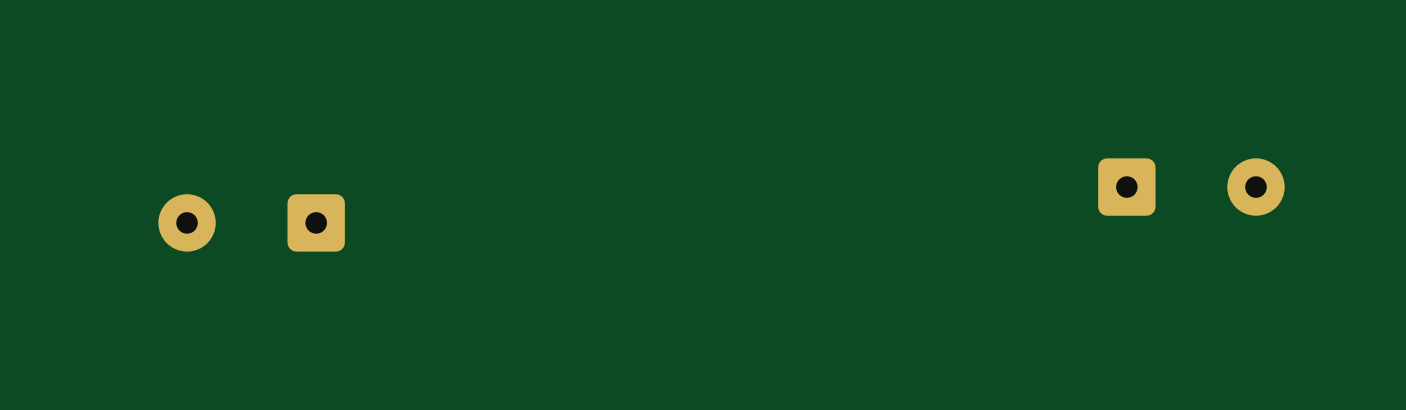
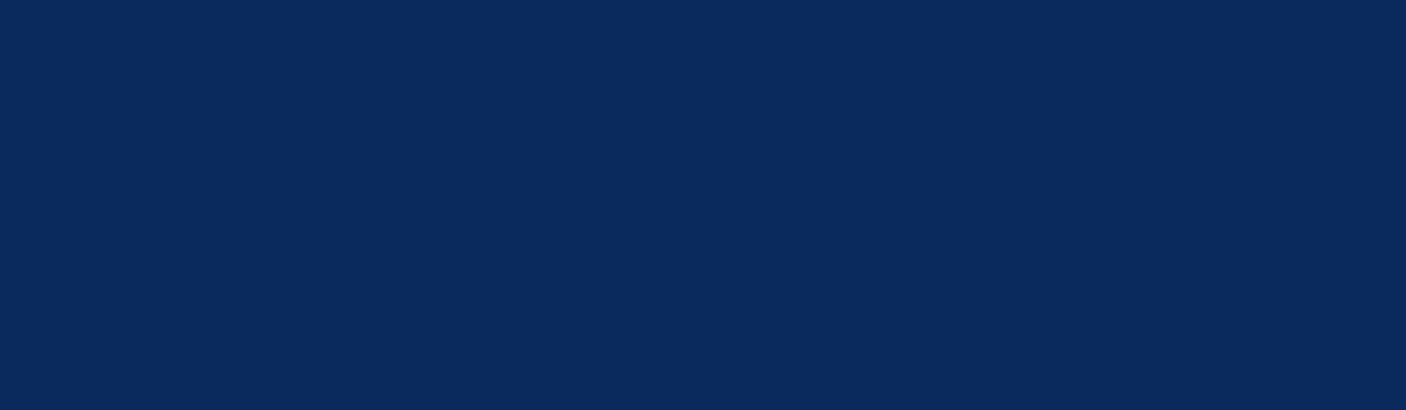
part: (1191, 187) -> none
part: (251, 222) -> none

